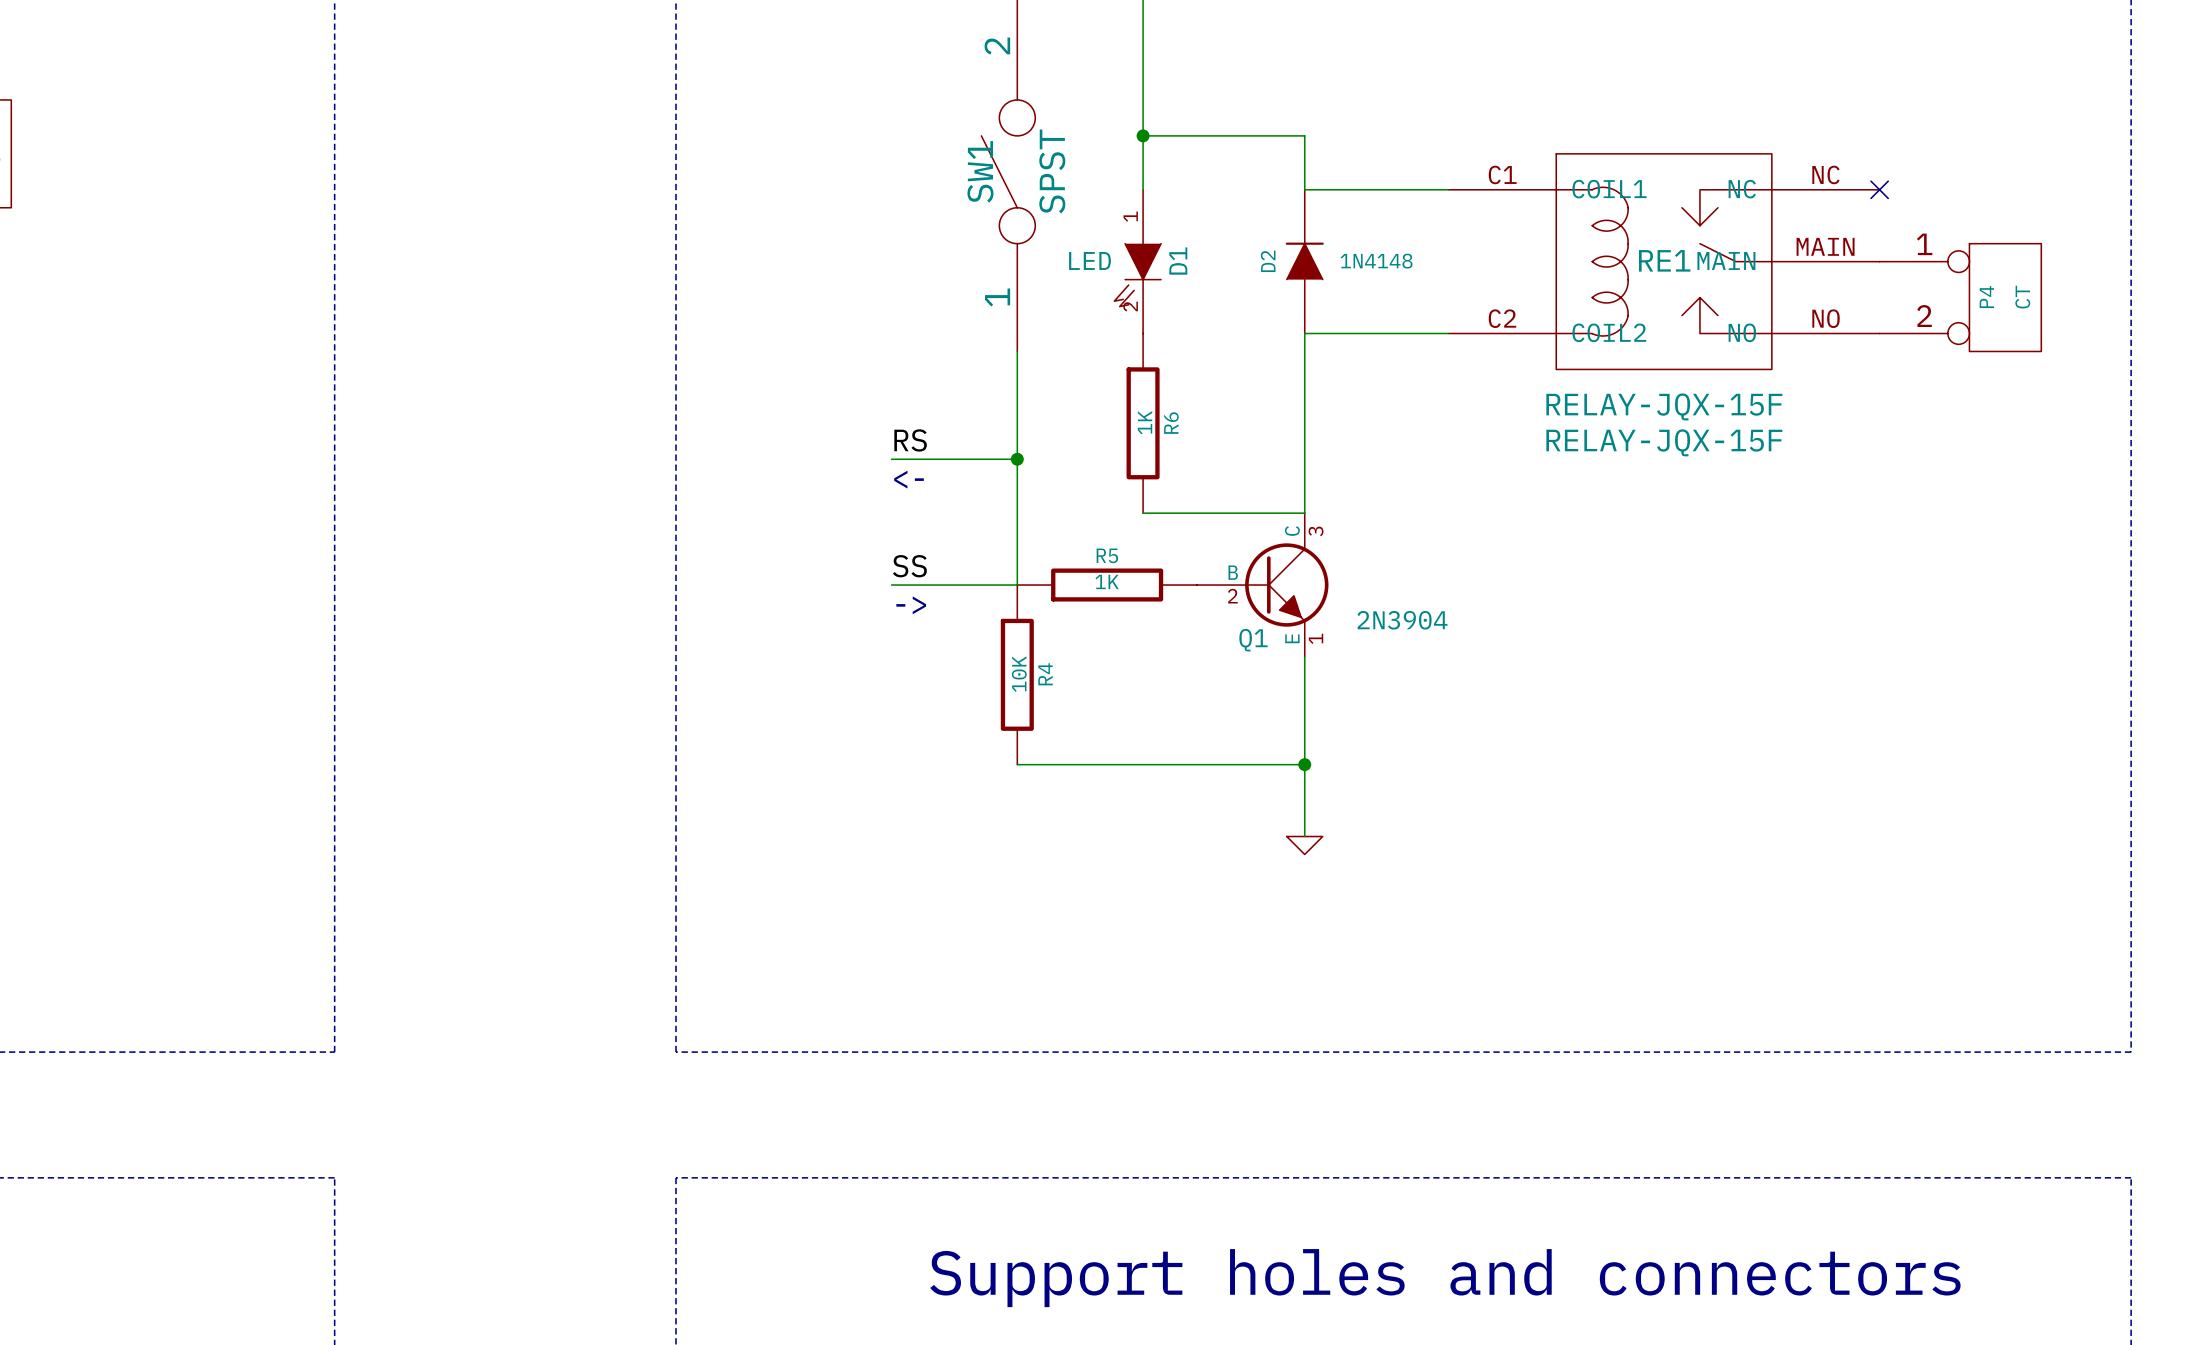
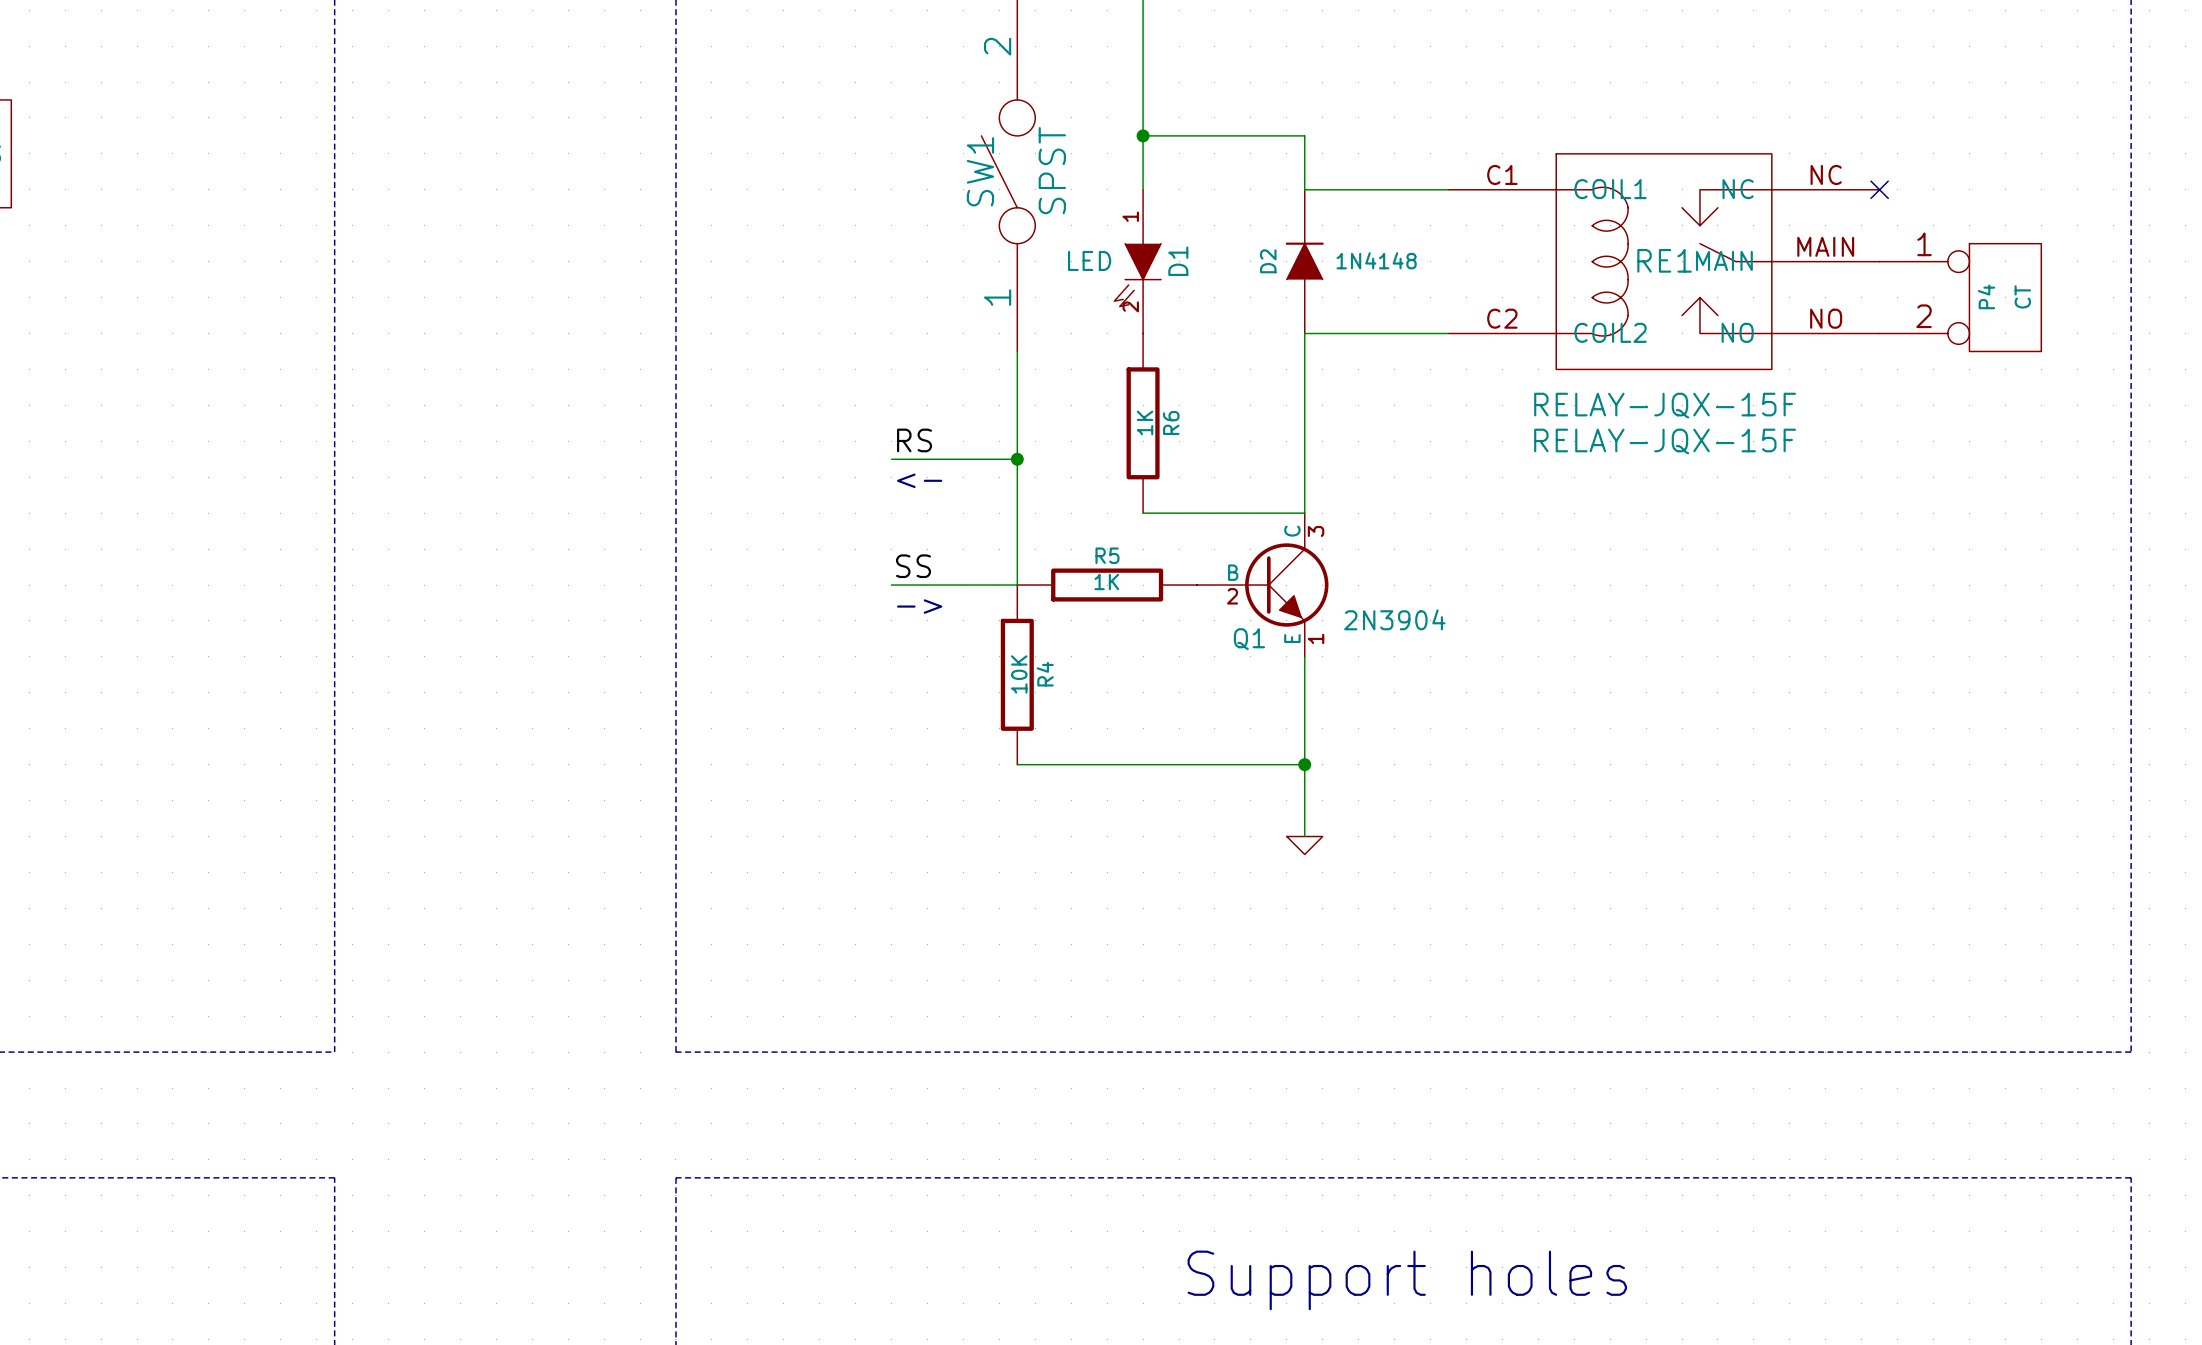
text: Support holes and connectors (1445, 1278) -> Support holes (1407, 1280)

